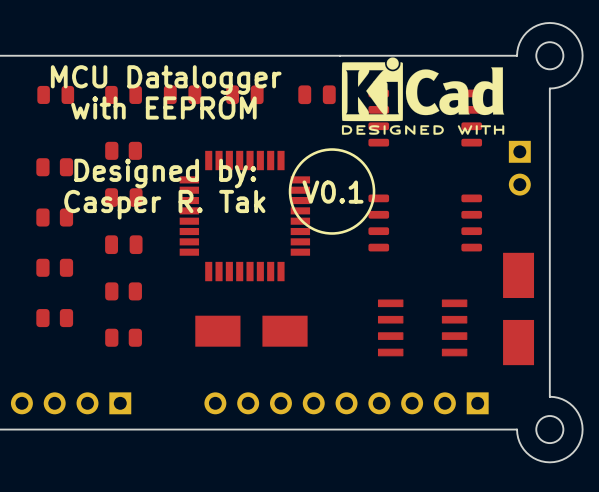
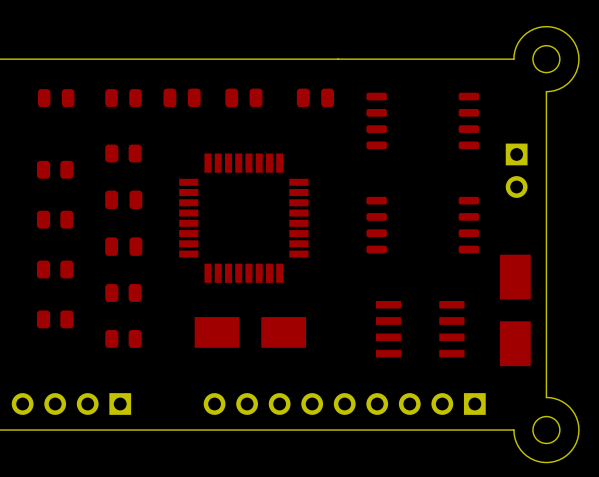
drawing: [288, 57, 505, 235] -> none
text: MCU Datalogger (166, 80) -> none
text: with EEPROM (163, 107) -> none
text: Designed by: (165, 173) -> none
text: V0.1 (333, 192) -> none
text: Casper R. Tak (164, 204) -> none

